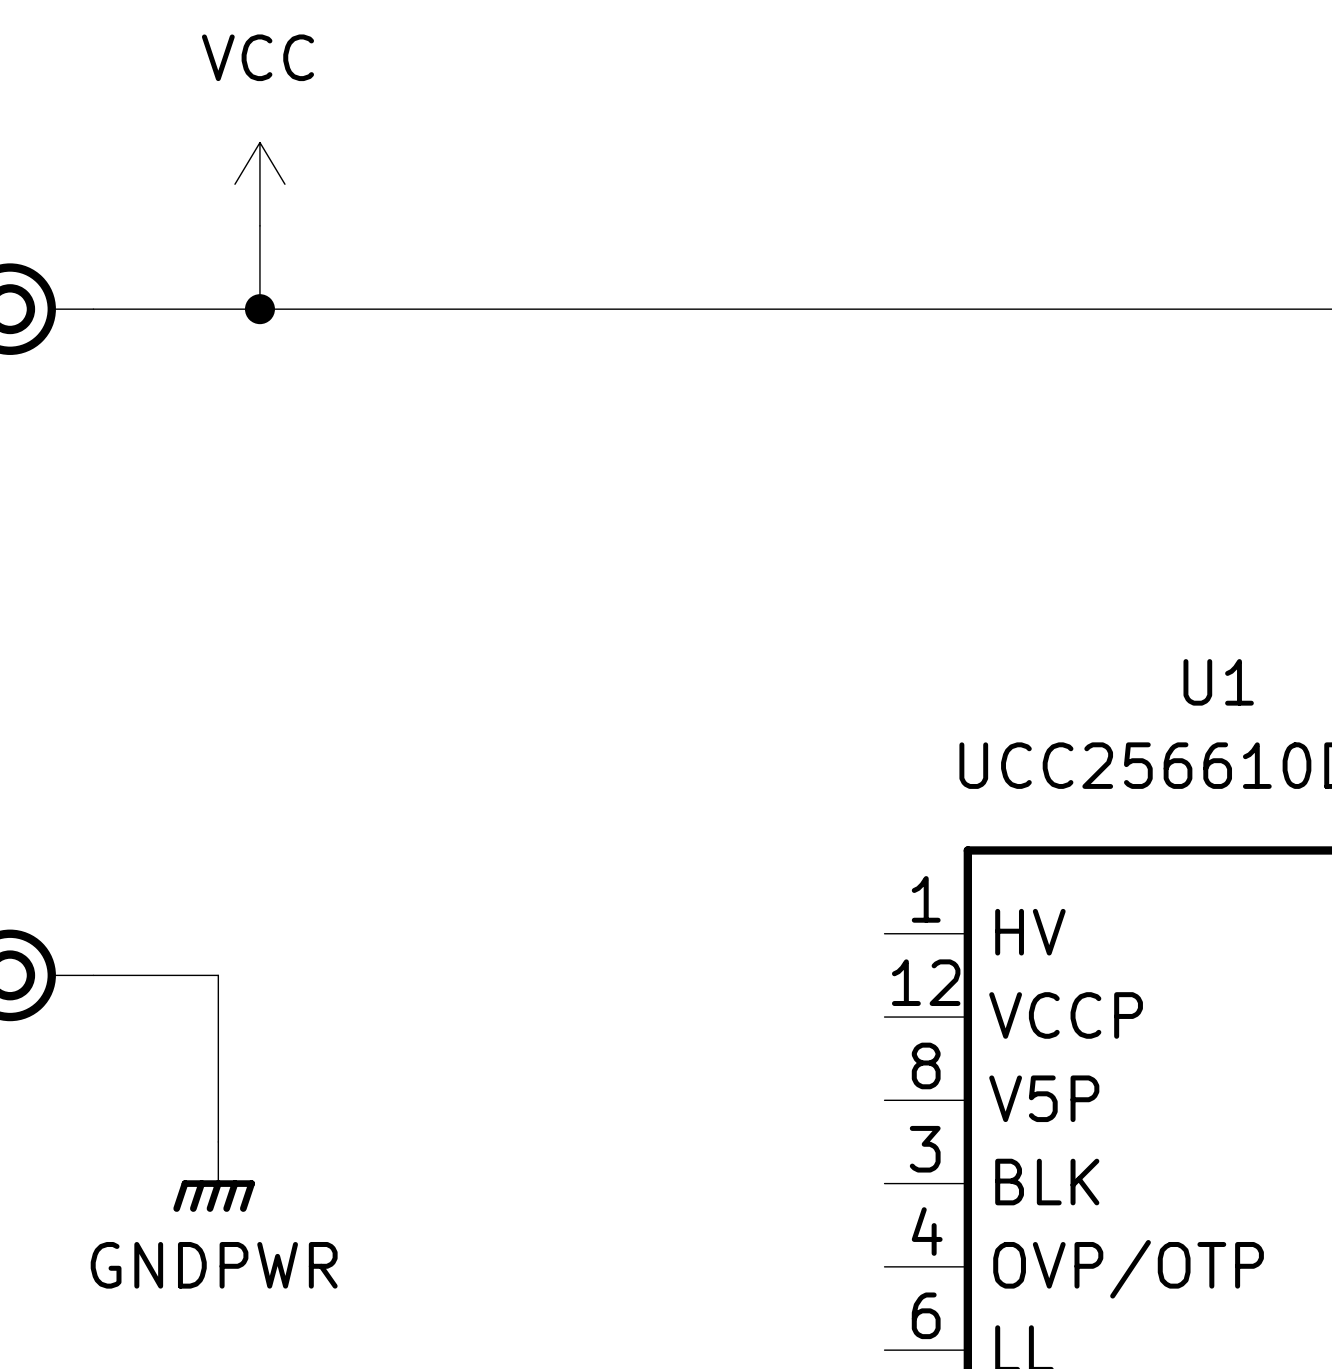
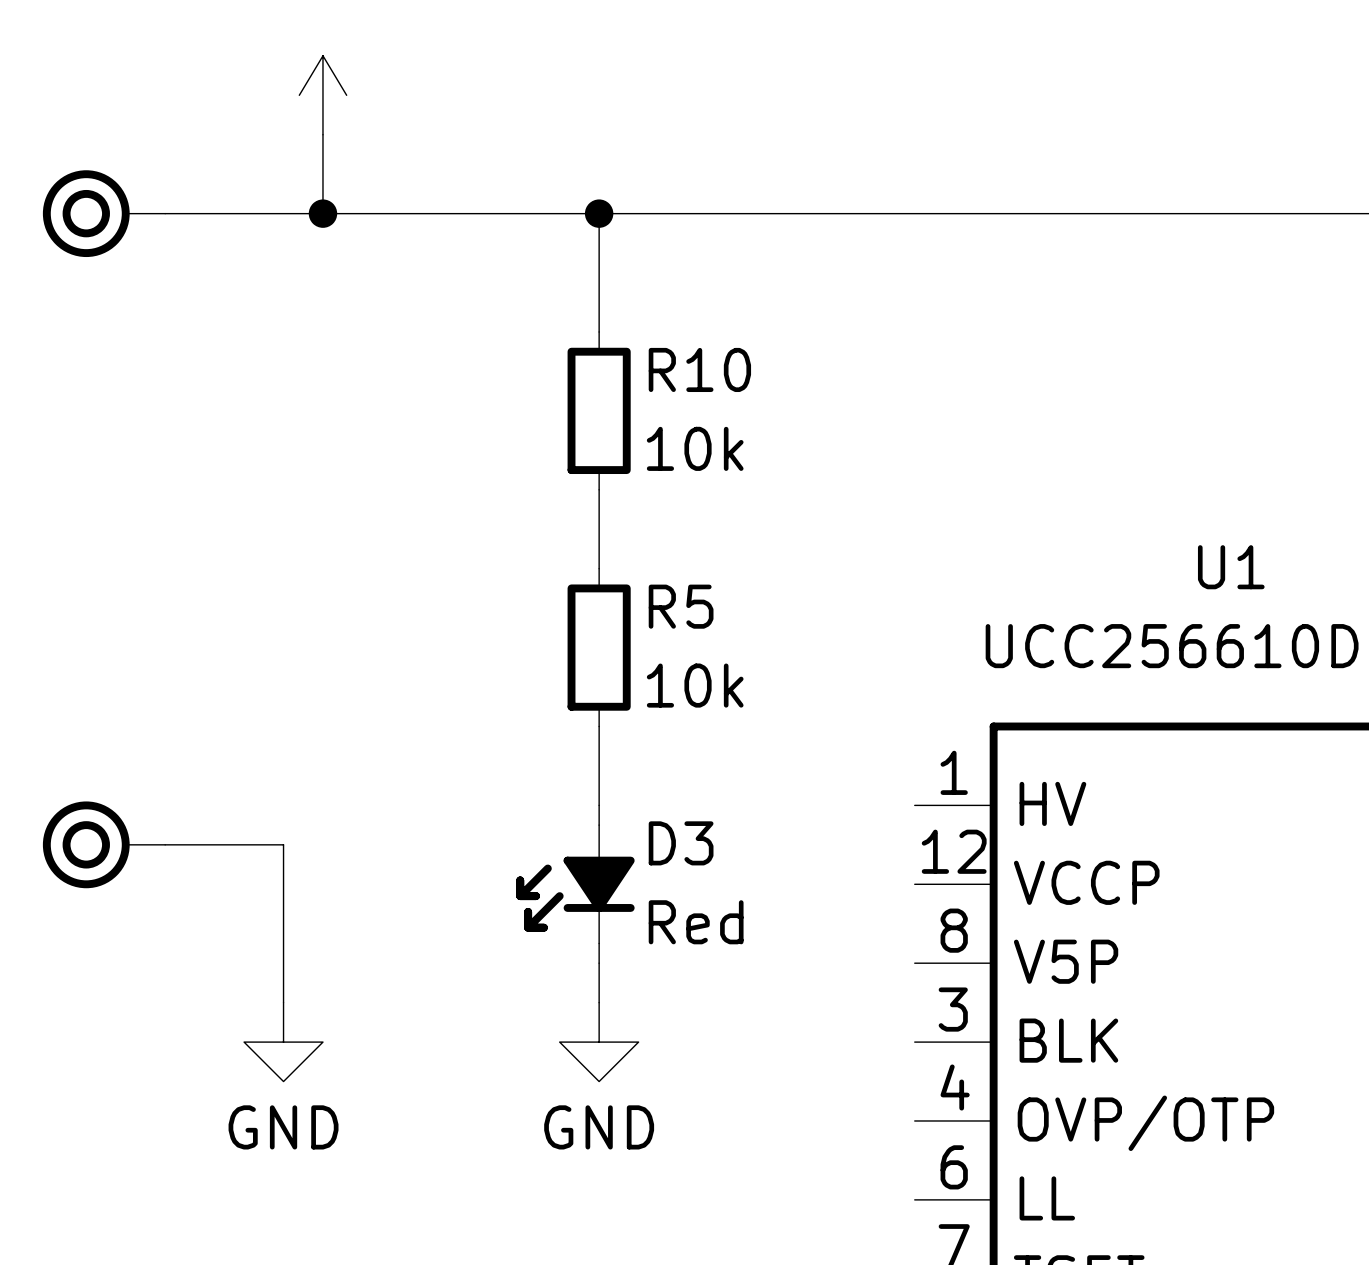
wire: none -> (599, 213) (599, 331)
junction: none -> (599, 213)
R10: none -> (599, 410)
wire: none -> (599, 489) (599, 568)
R5: none -> (599, 647)
wire: none -> (599, 726) (599, 805)
D3: none -> (575, 884)
wire: none -> (599, 963) (599, 1002)
power symbol: GNDPWR (214, 1176) -> GND (283, 1042)
power symbol: none -> GND (599, 1042)

